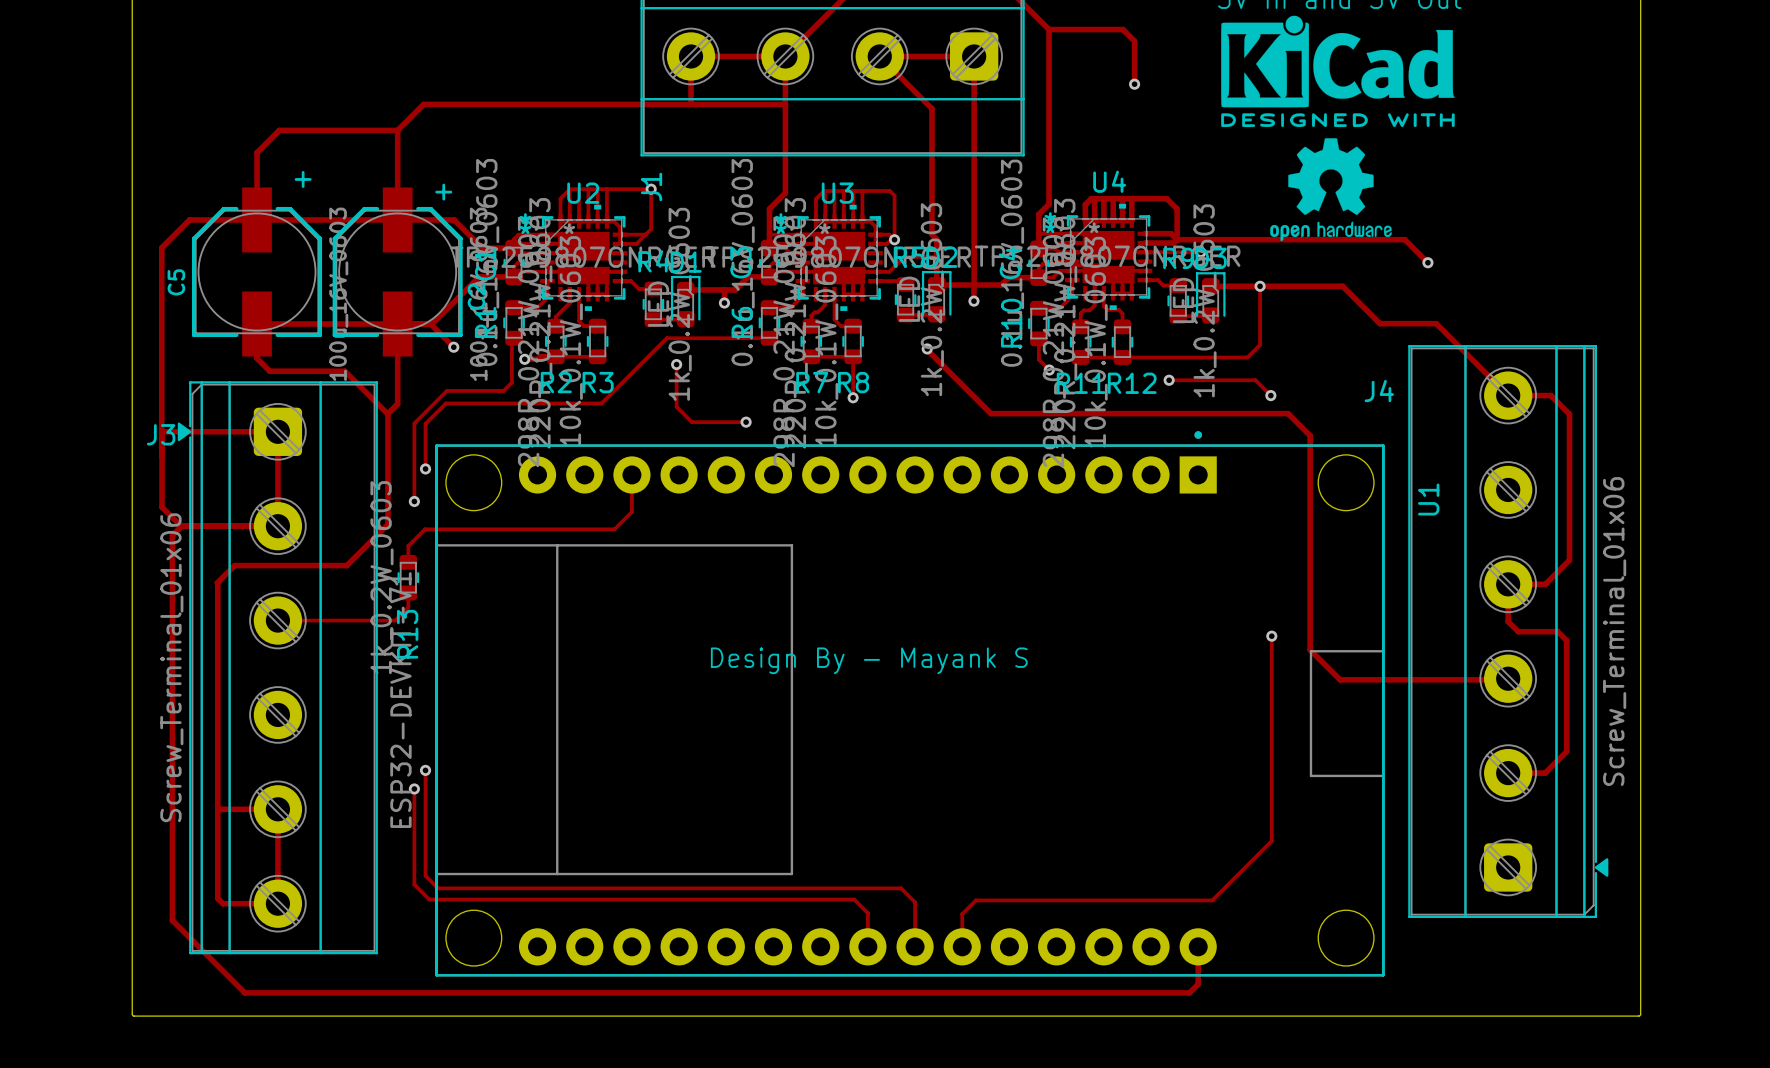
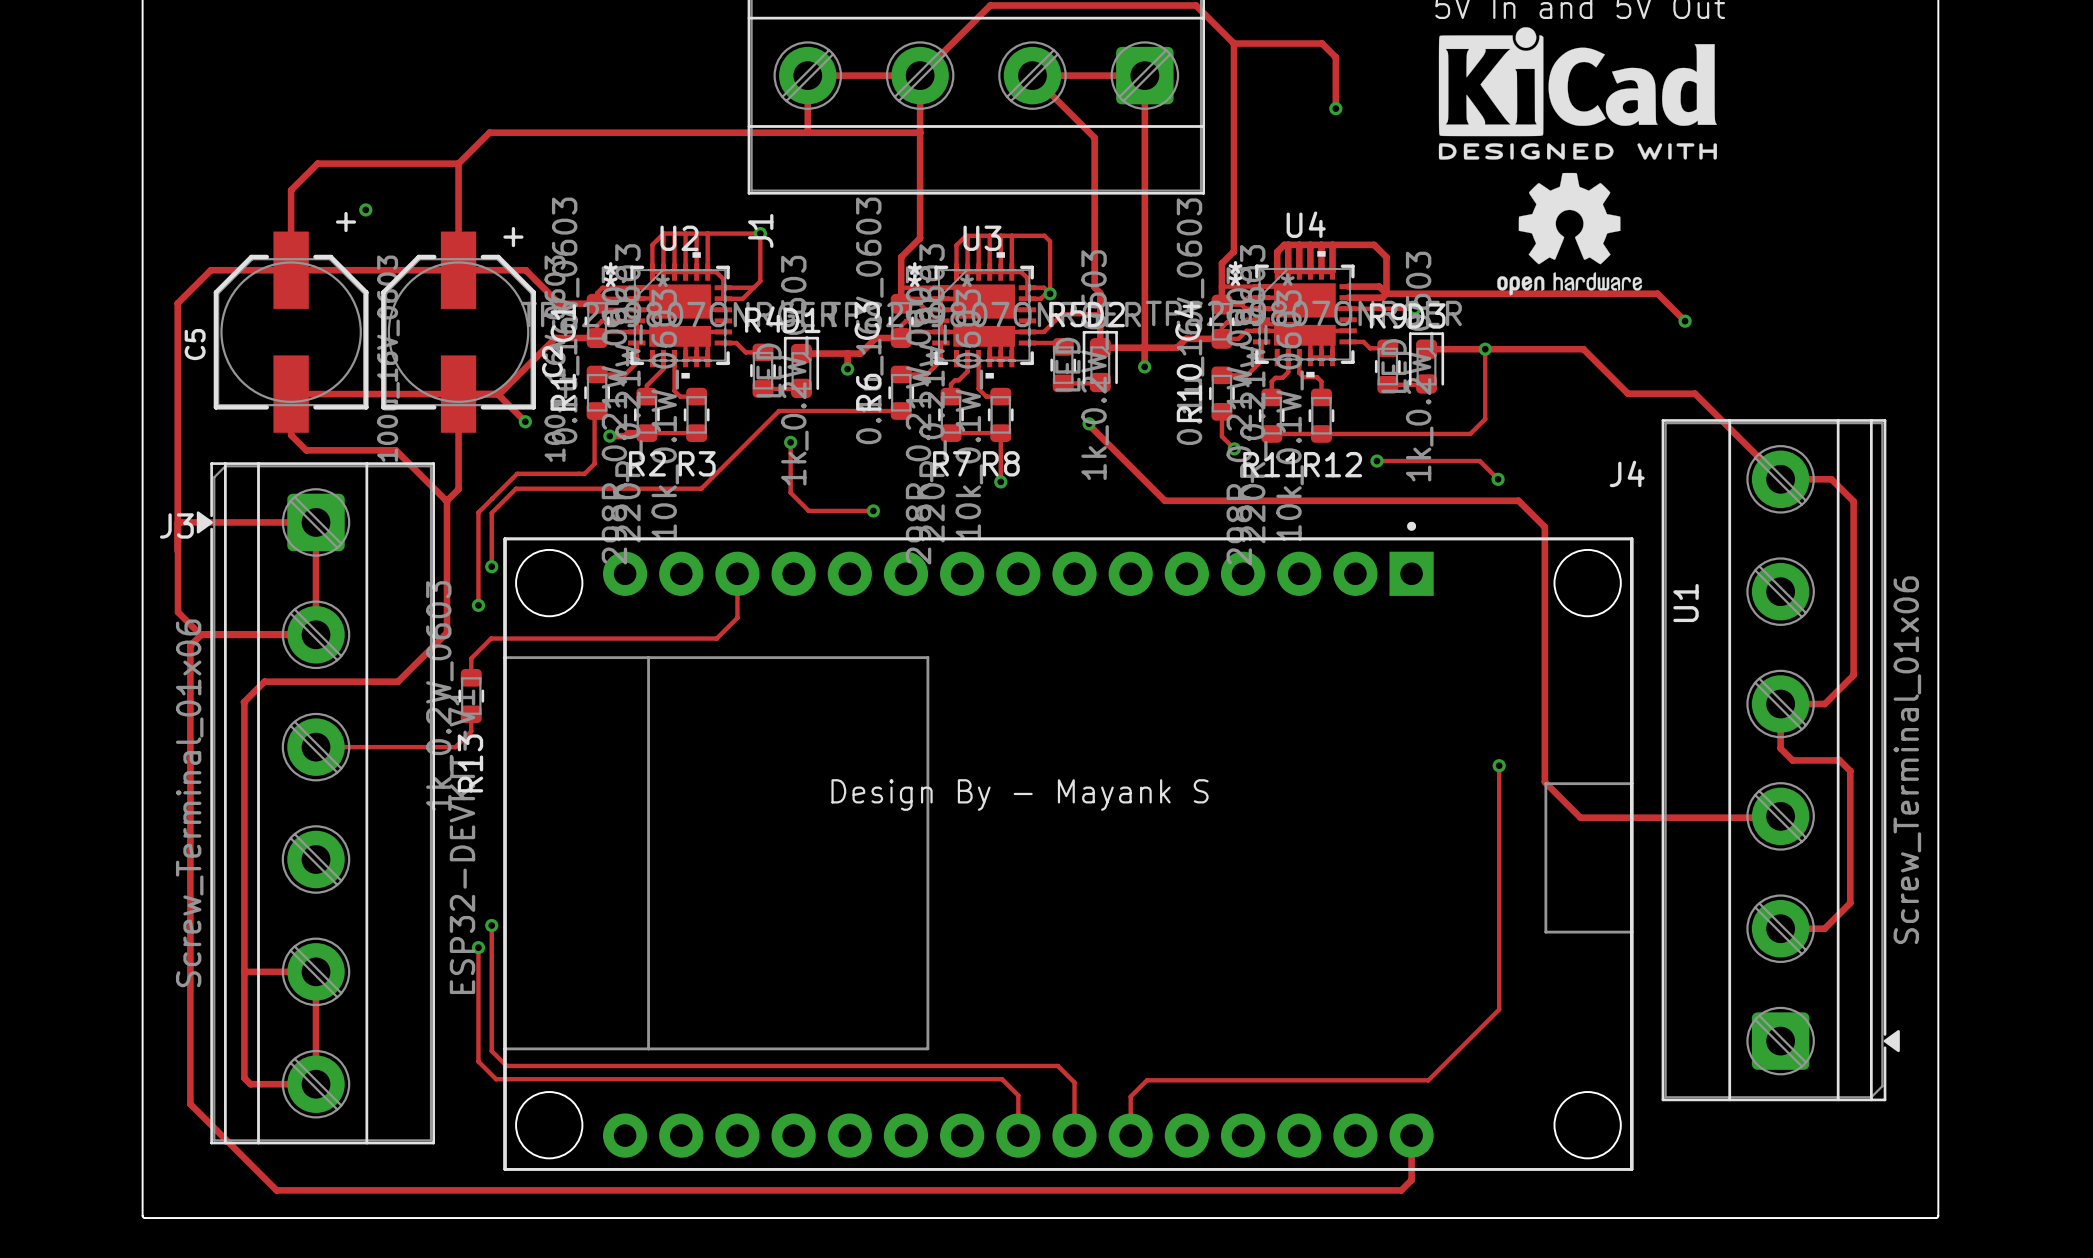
via: none -> (365, 209)

